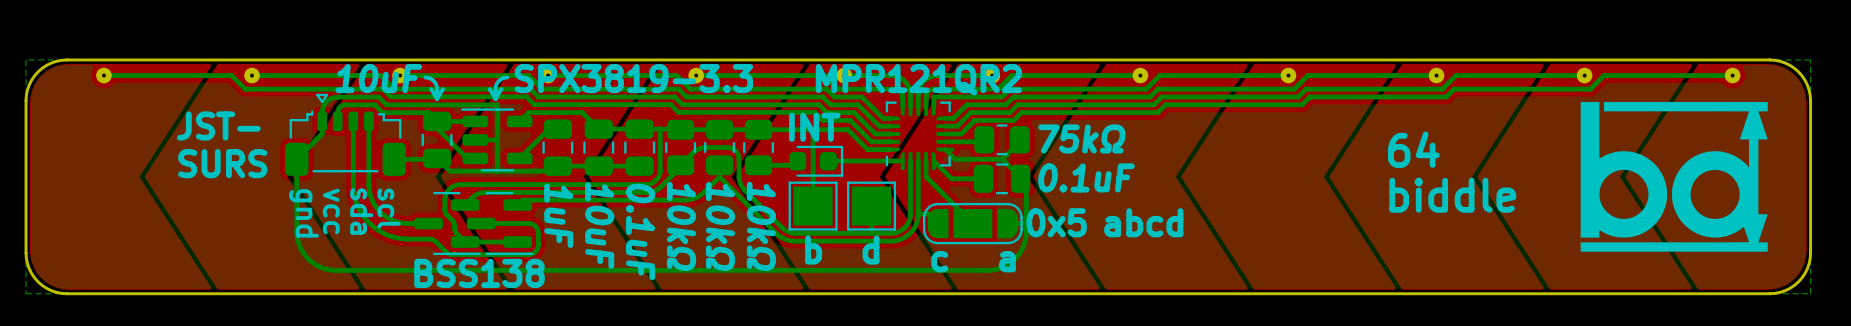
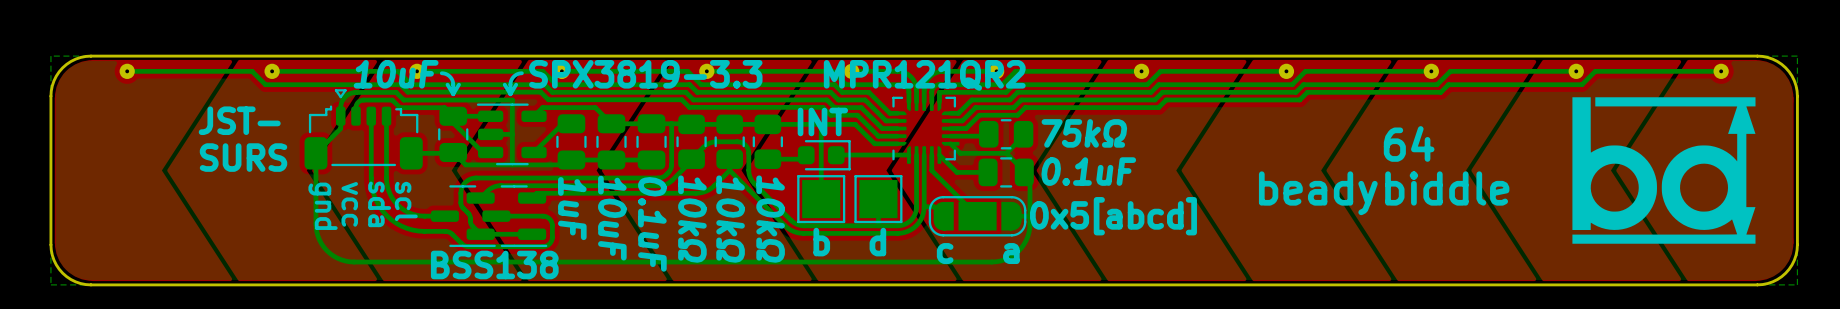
text: none -> beady (1318, 193)
text: none -> [ (1099, 216)
text: none -> ] (1191, 216)

